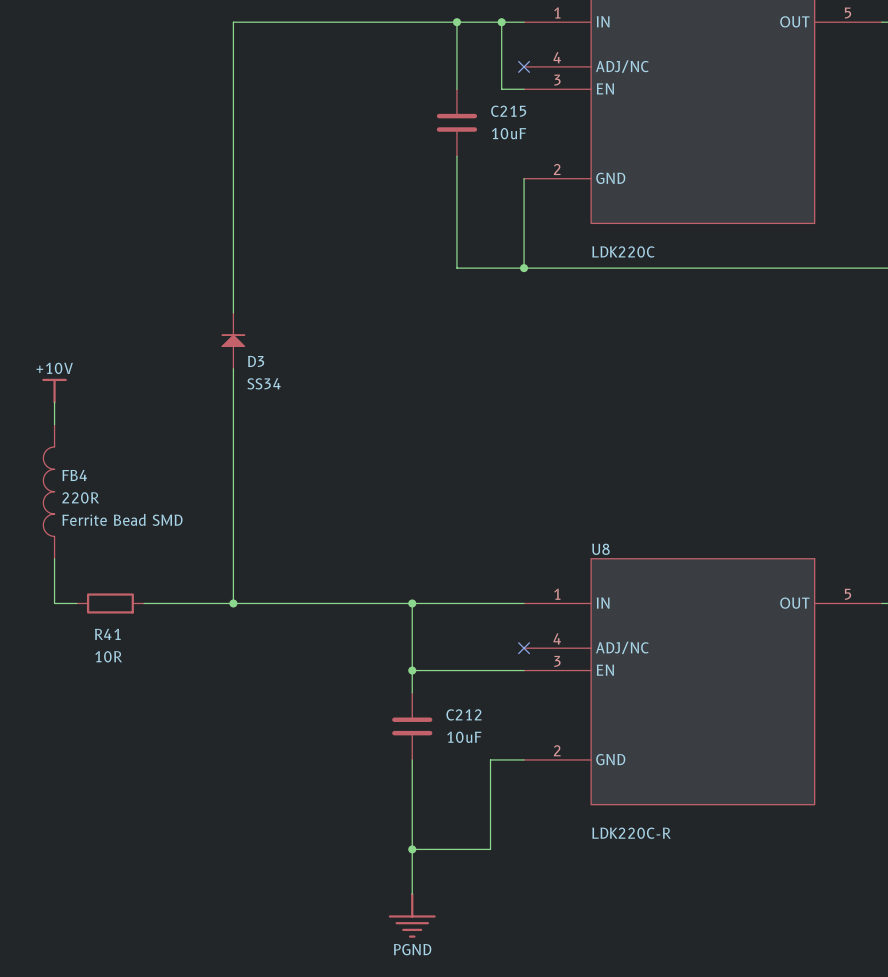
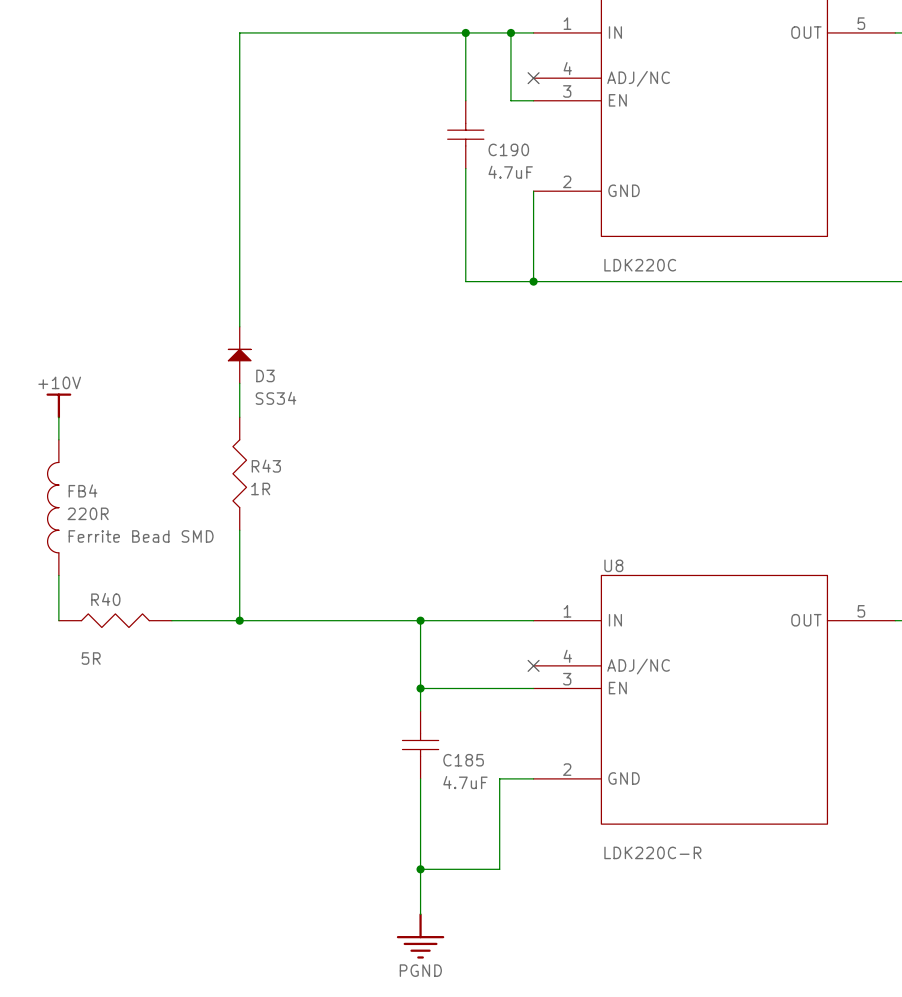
C215: 10uF (456, 122) -> none
C190: none -> (465, 134)
wire: (233, 402) (233, 514) -> none
R43: none -> (239, 473)
R41: 10R (110, 603) -> none
R40: none -> (115, 620)
C212: 10uF (412, 726) -> none
C185: none -> (420, 745)

